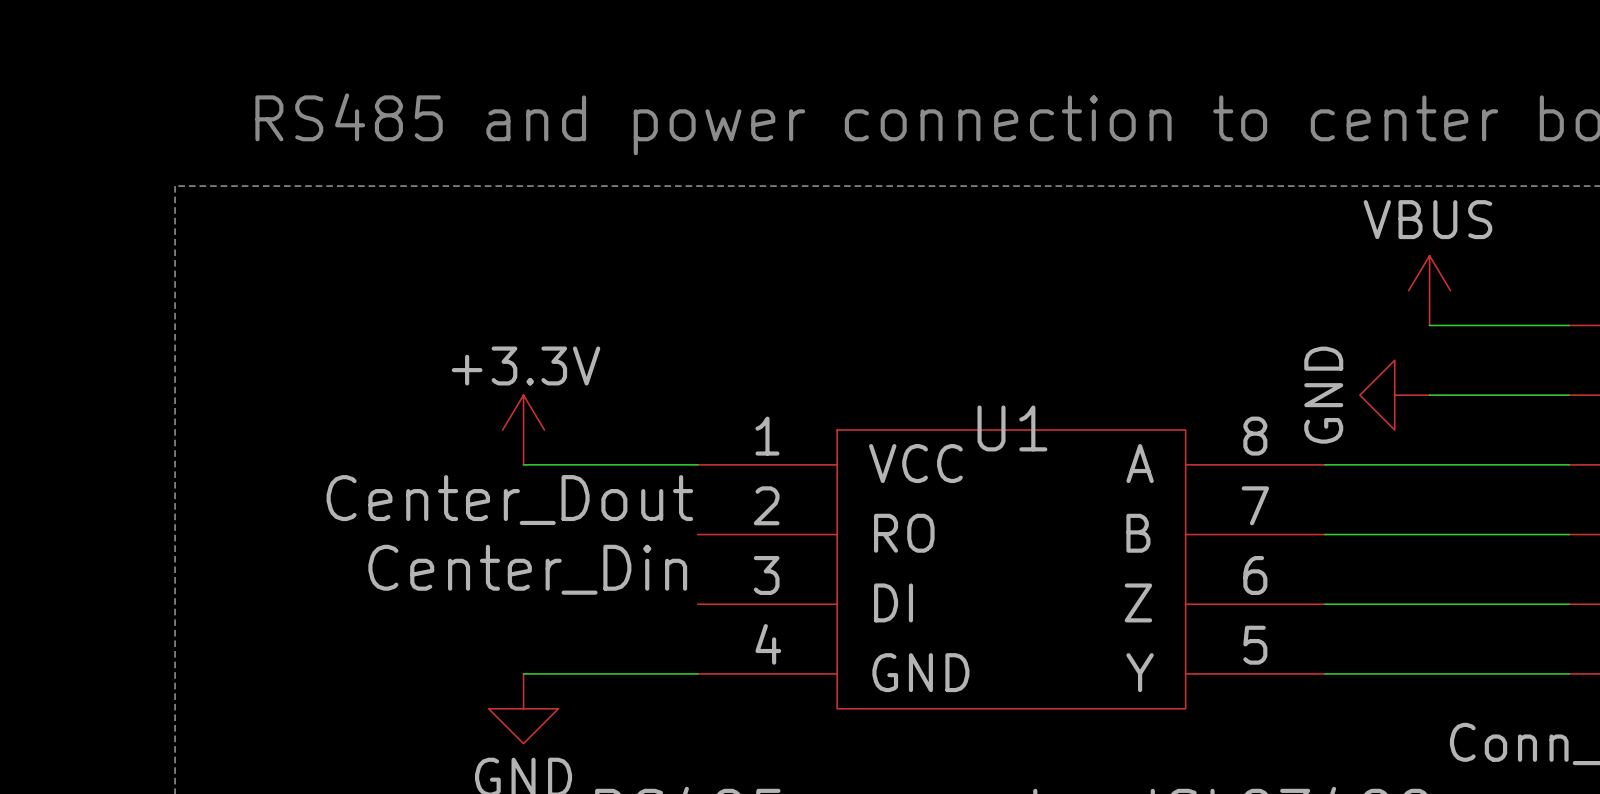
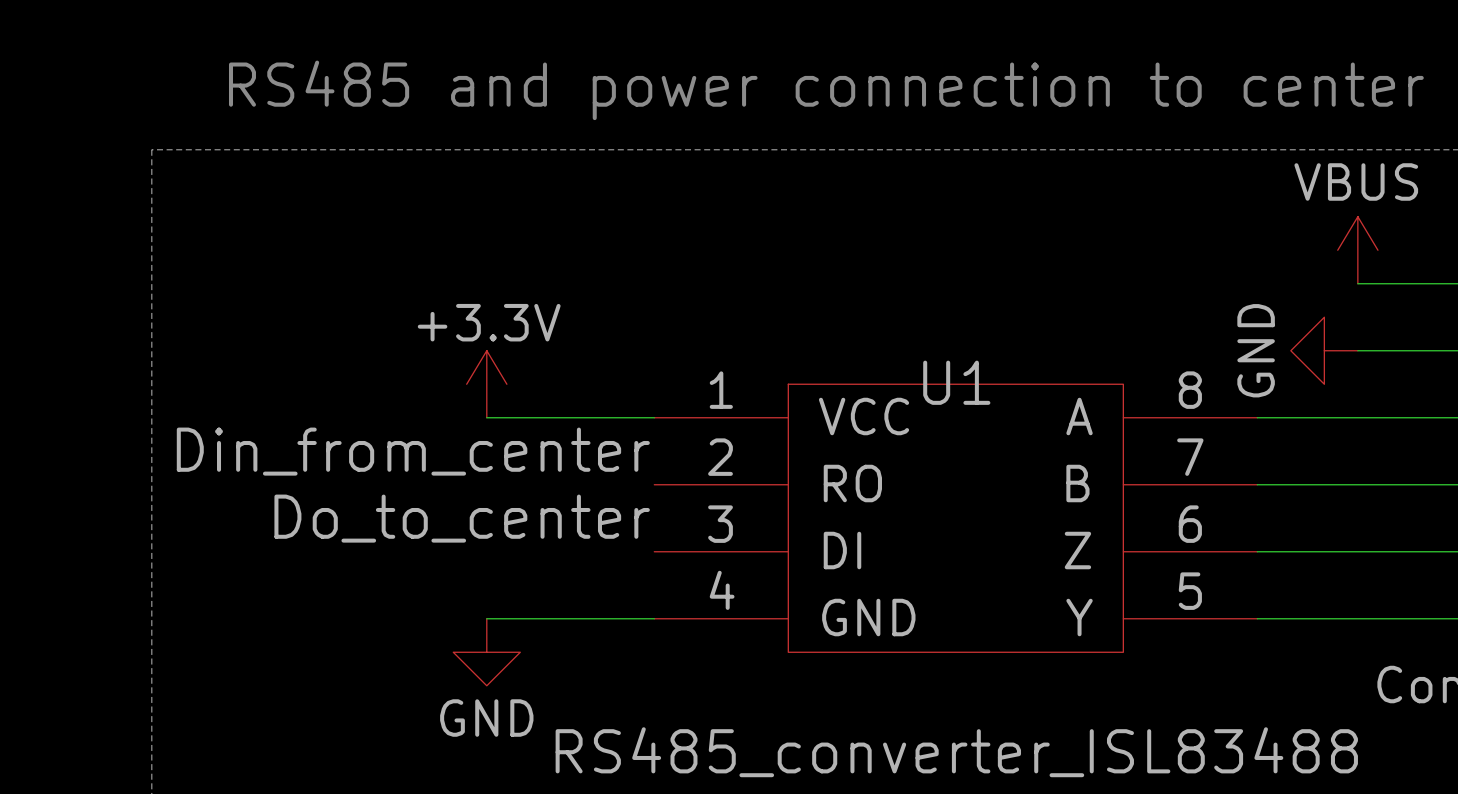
label: Center_Dout (509, 500) -> Din_from_center (413, 451)
label: Center_Din (527, 569) -> Do_to_center (462, 518)

